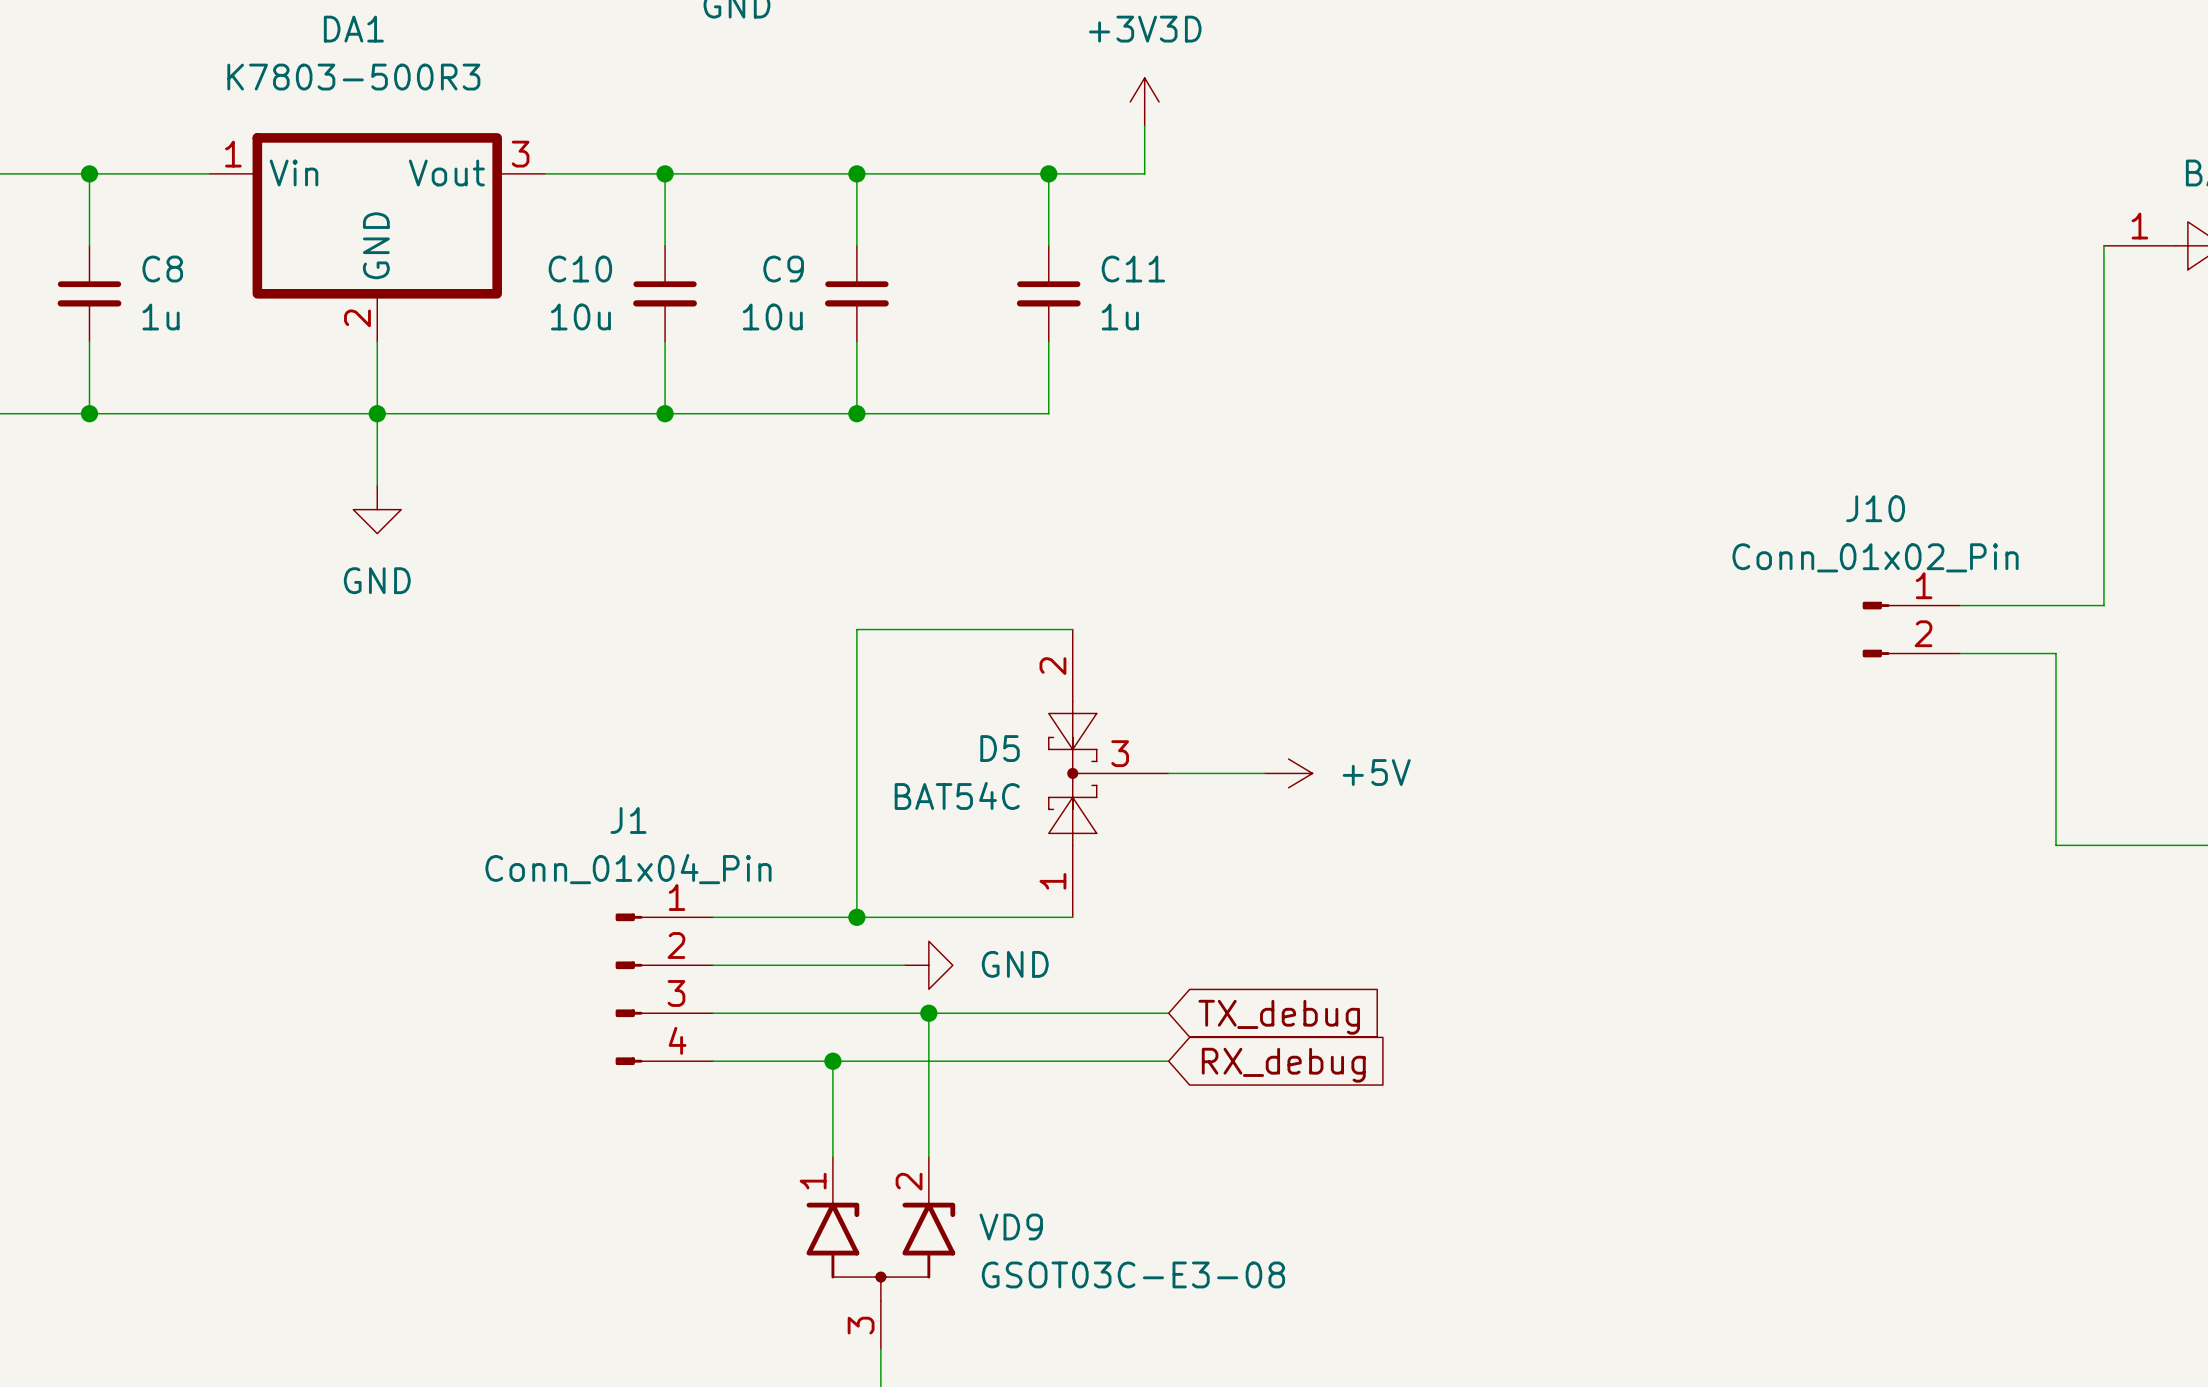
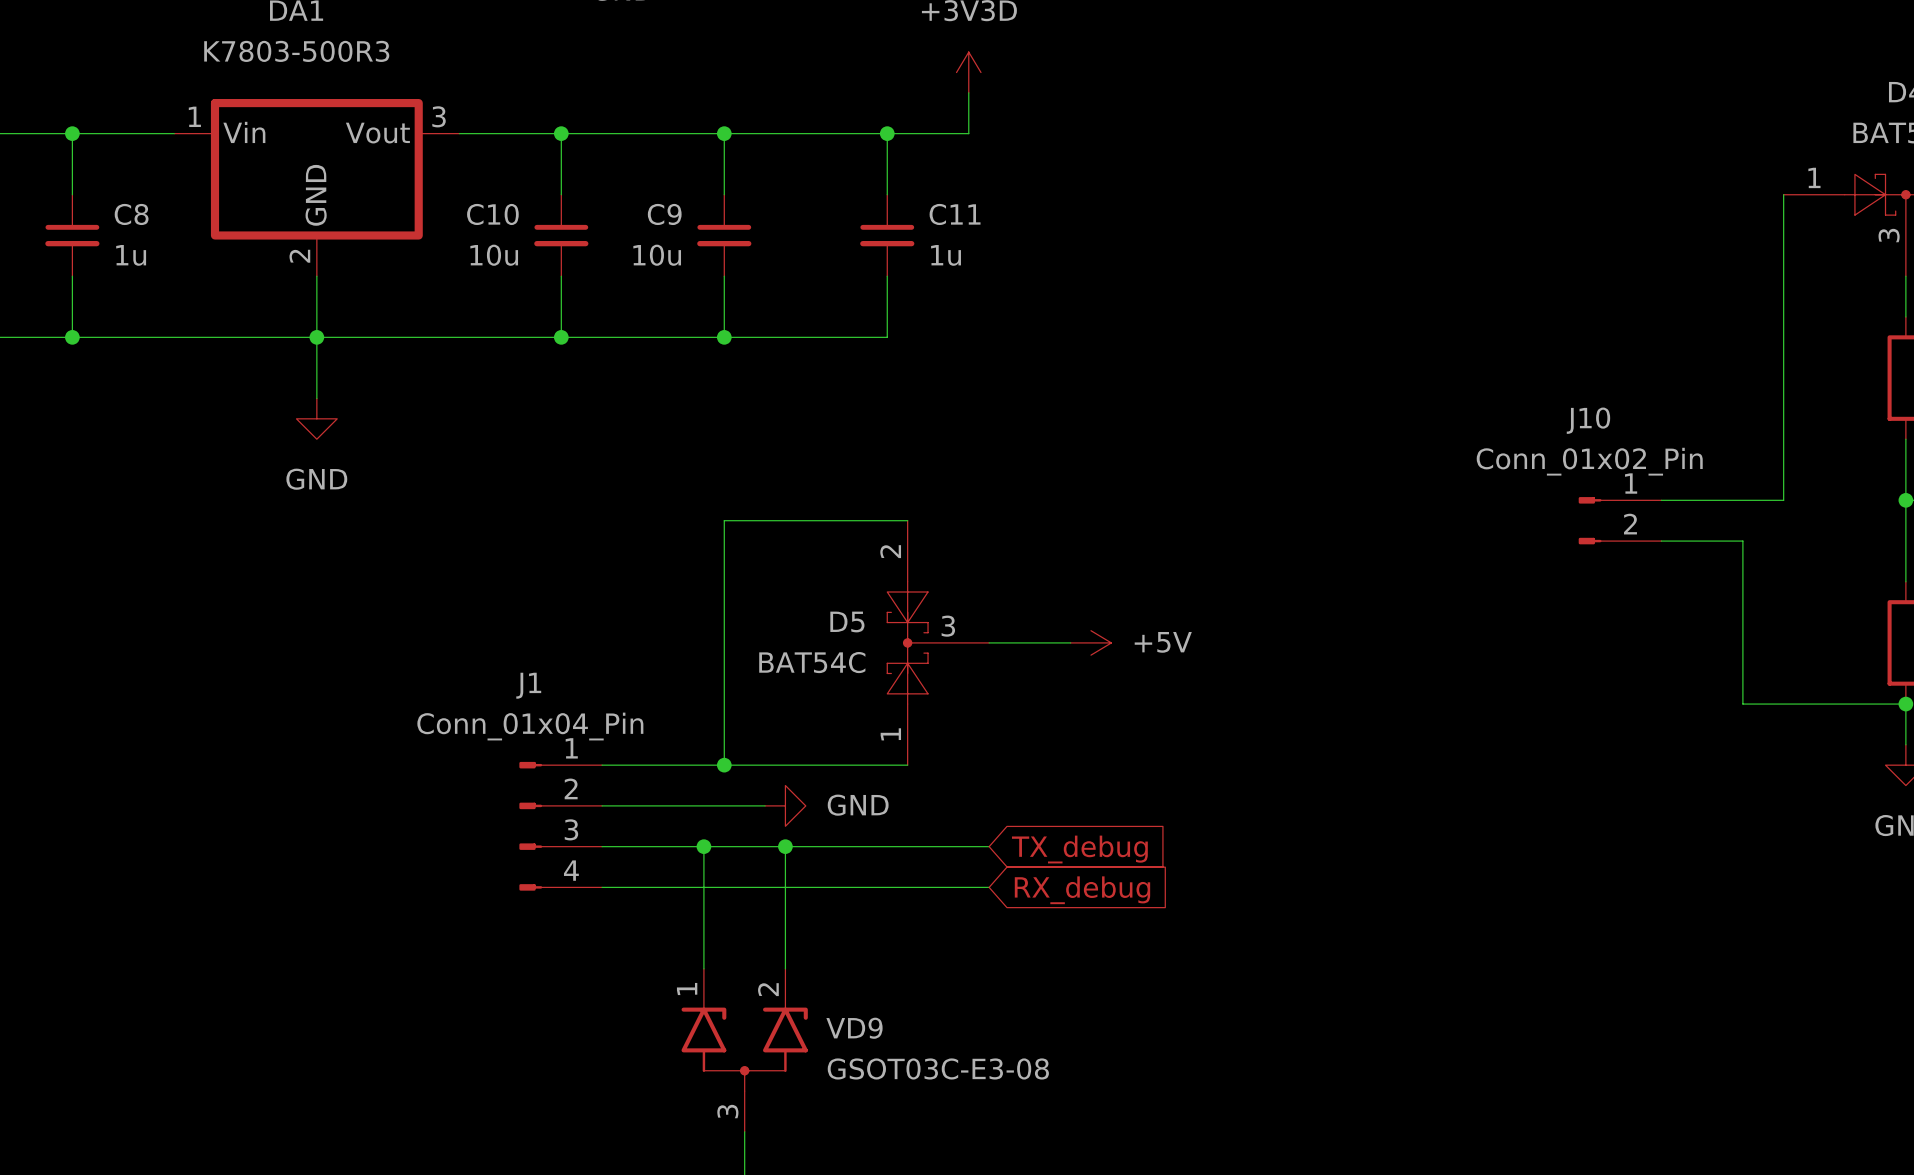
wire: none -> (703, 846) (703, 887)
junction position: (832, 1061) -> (703, 846)

